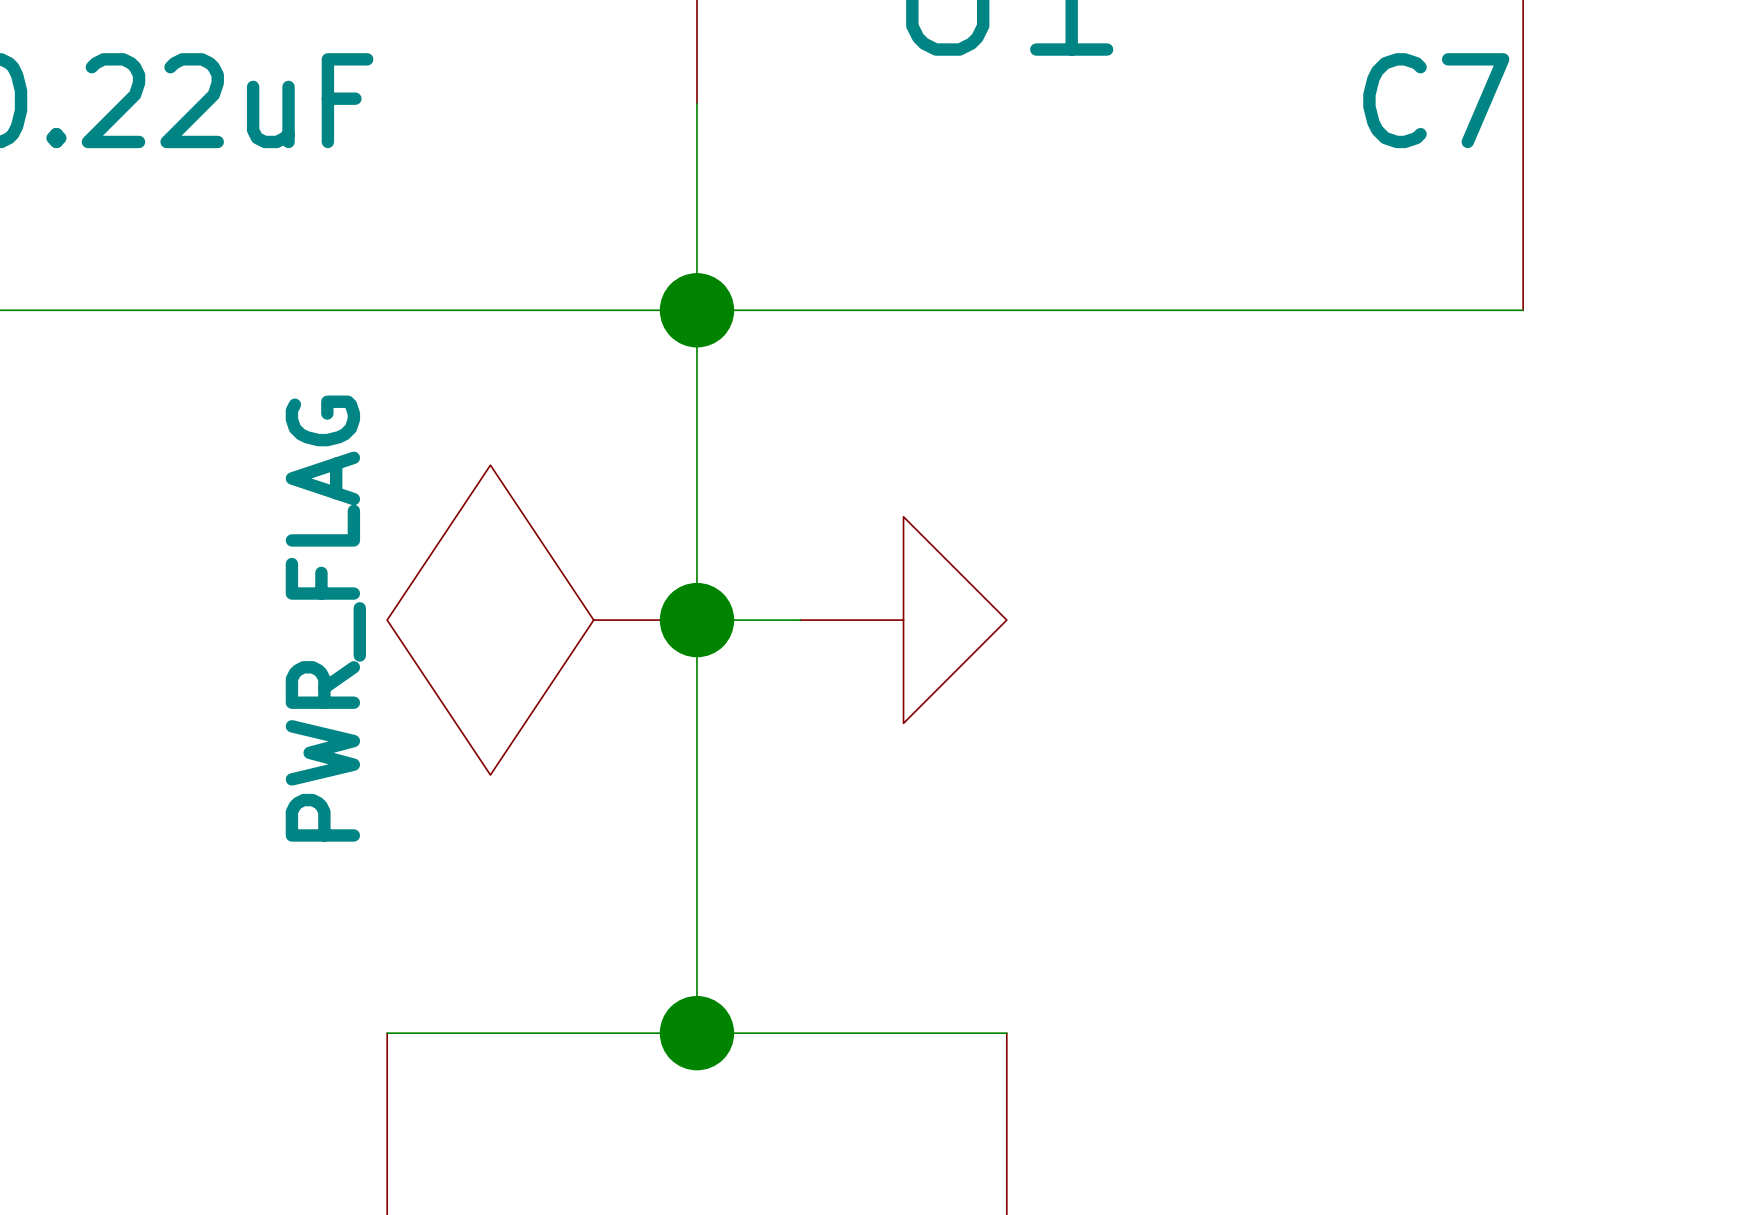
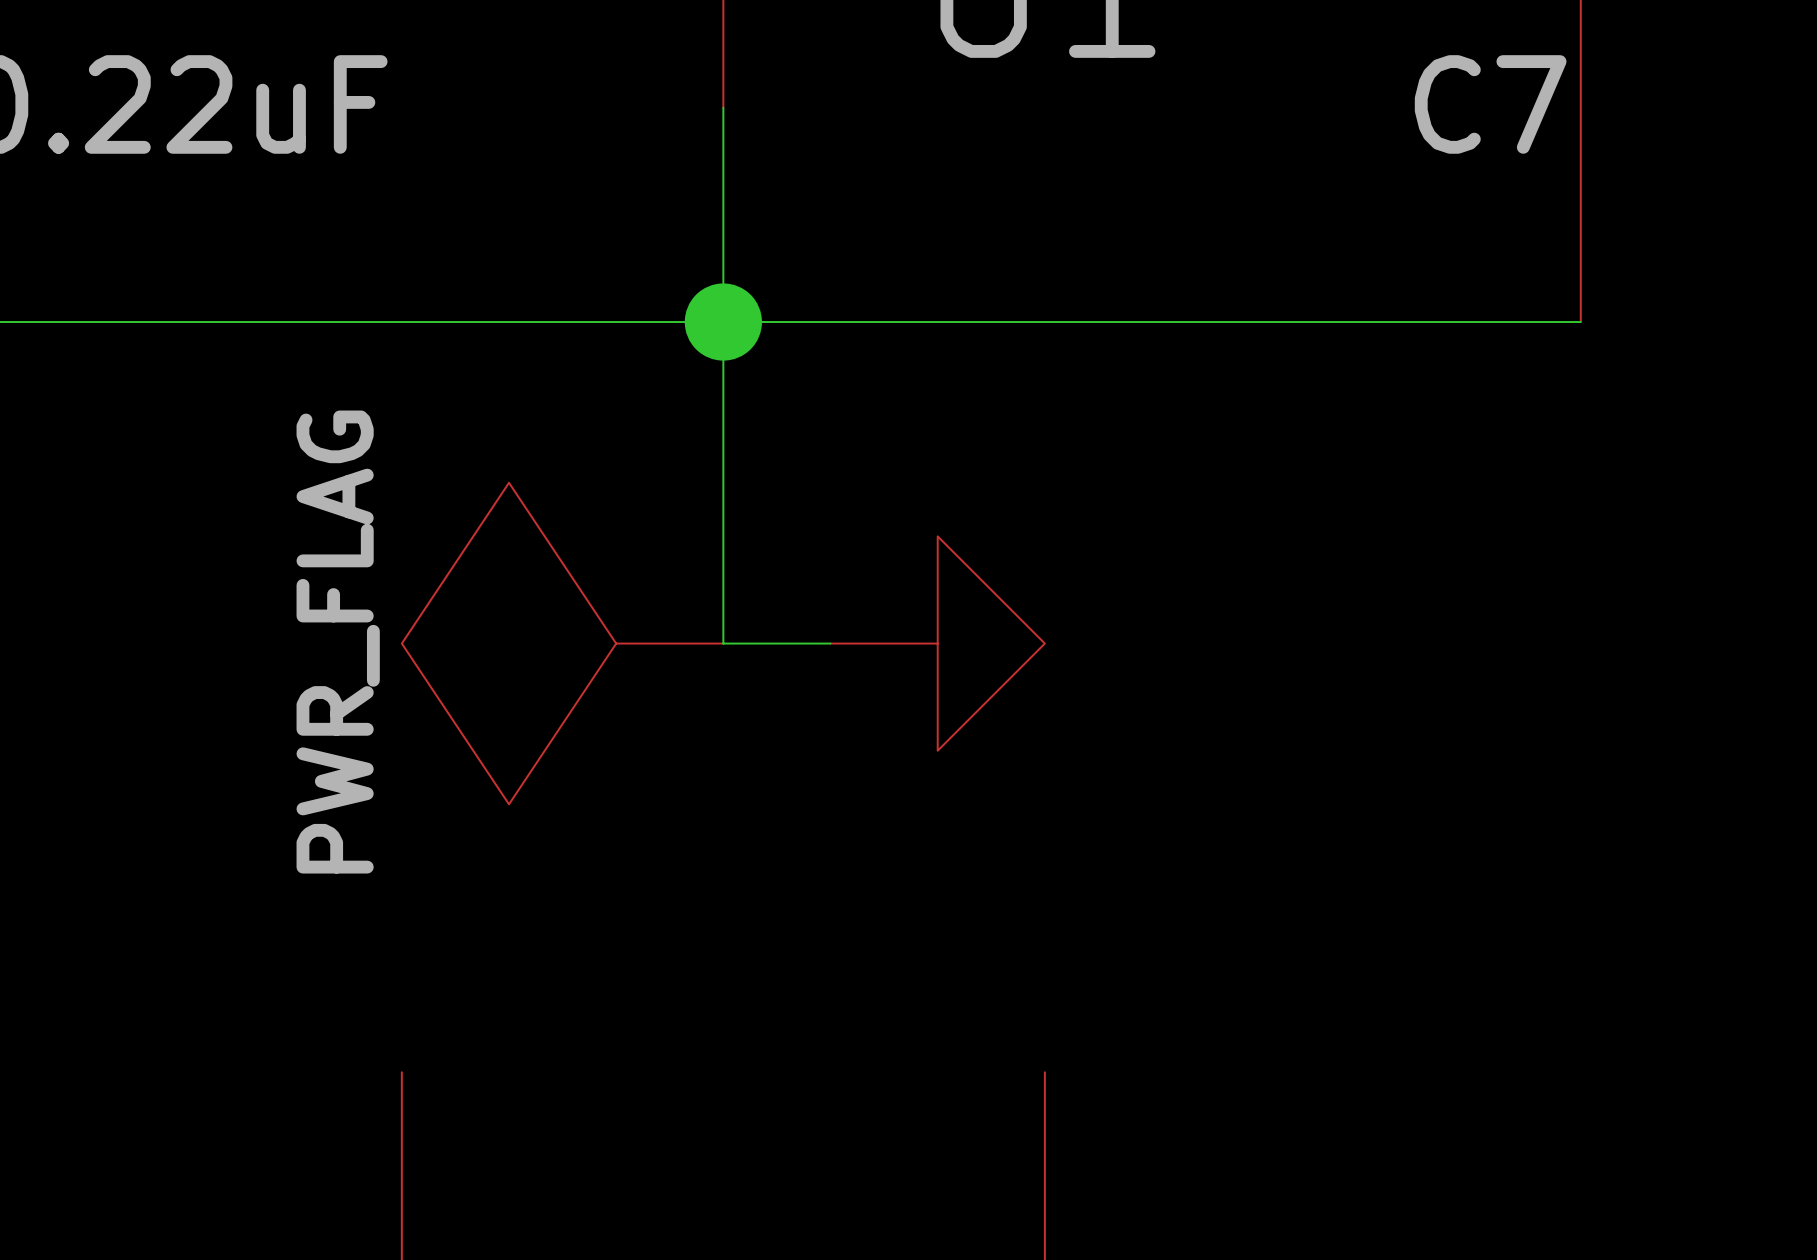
wire: (696, 620) (696, 1033) -> none
junction: (696, 620) -> none
wire: (387, 1033) (1006, 1033) -> none
junction: (696, 1033) -> none

